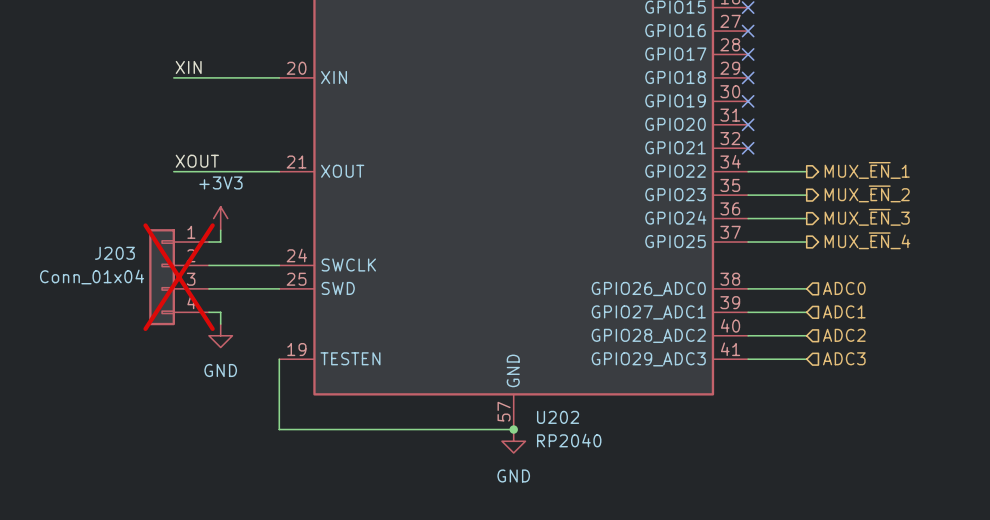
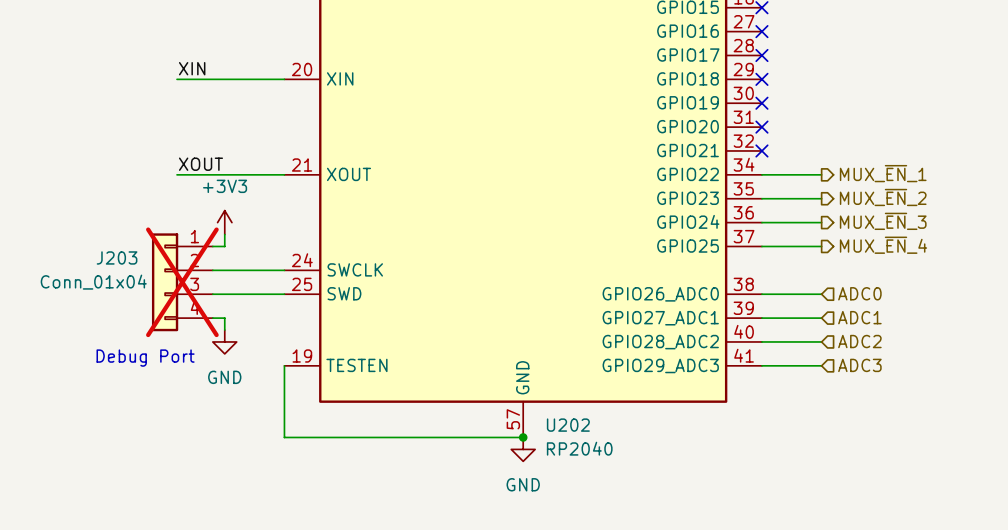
text: none -> Debug Port (145, 358)

